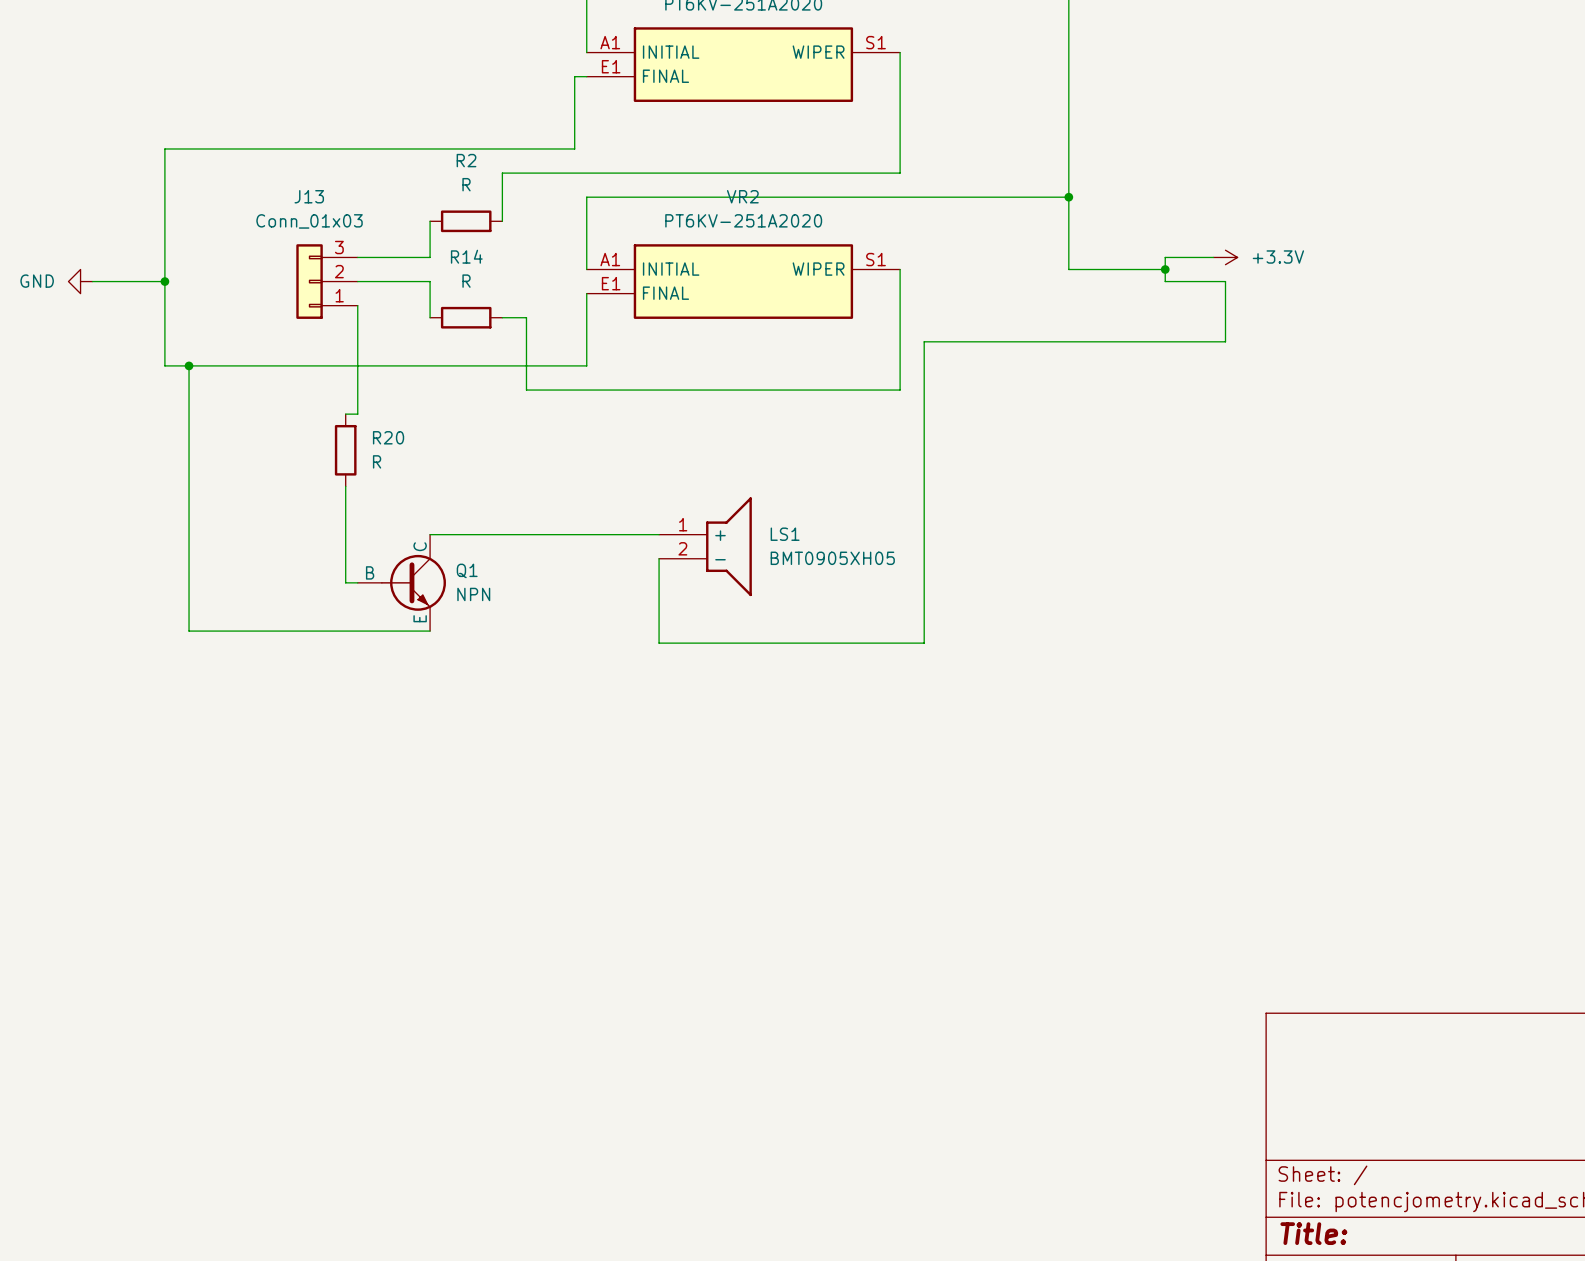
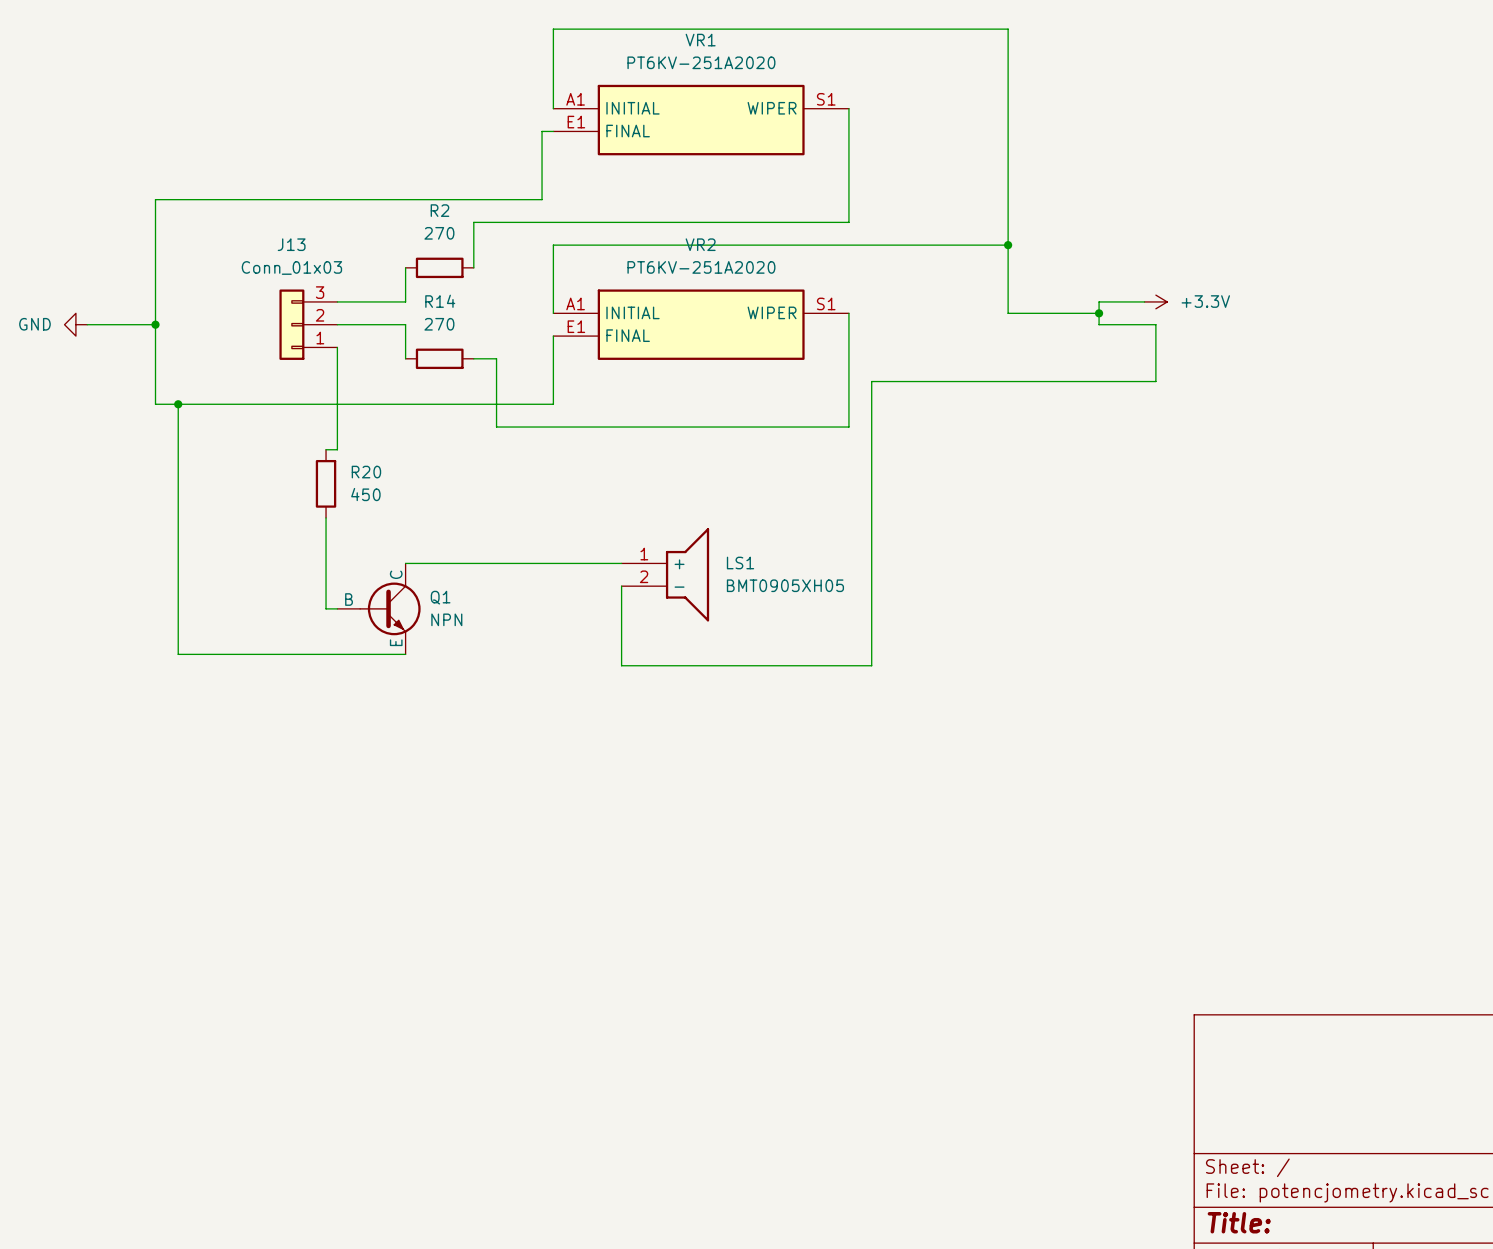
R2 value: R (466, 184) -> 270 (439, 233)
R14 value: R (466, 281) -> 270 (439, 324)
R20 value: R (377, 461) -> 450 (365, 494)

